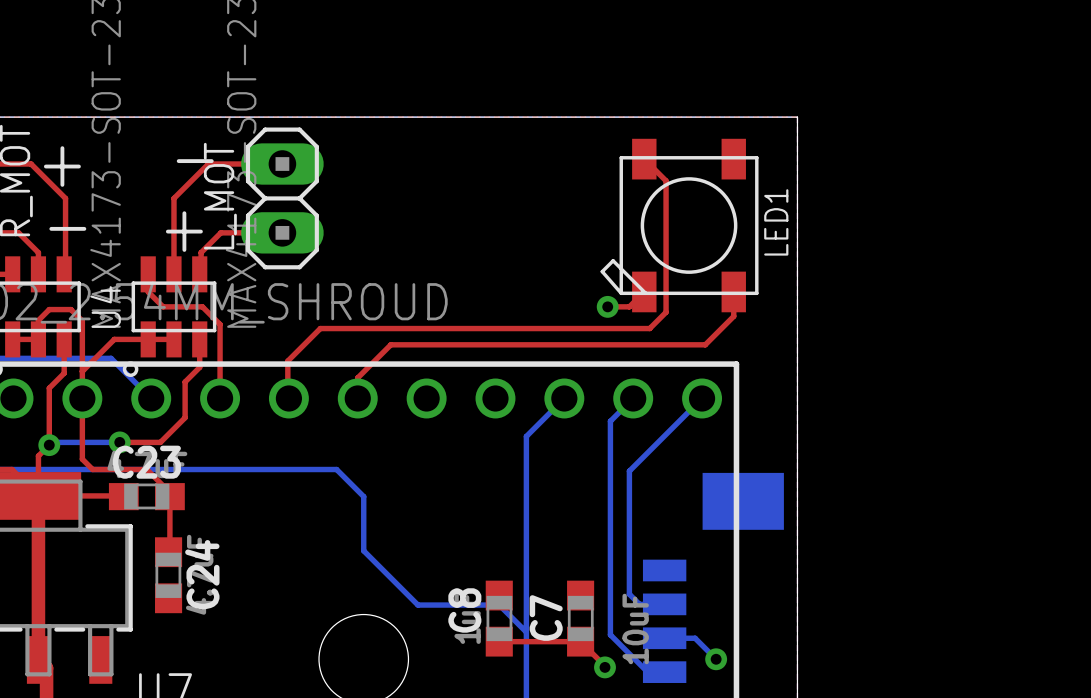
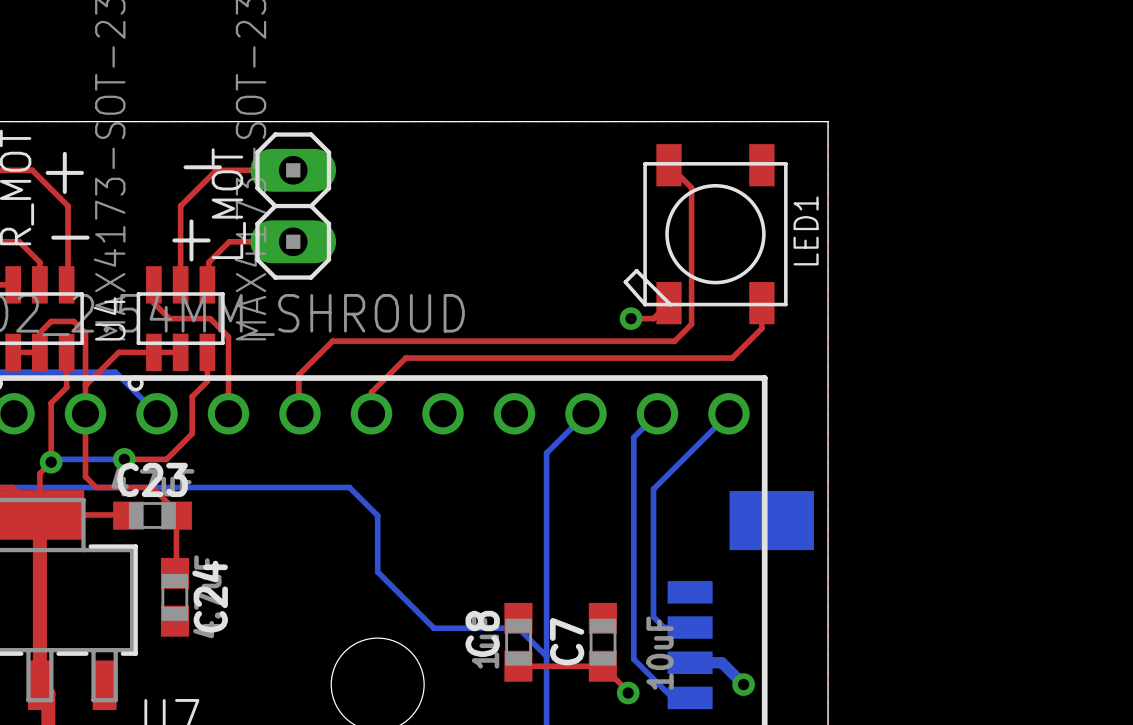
bottom track width: thin (664, 638) (695, 638) (716, 659) -> thick (690, 662) (721, 662) (743, 684)

